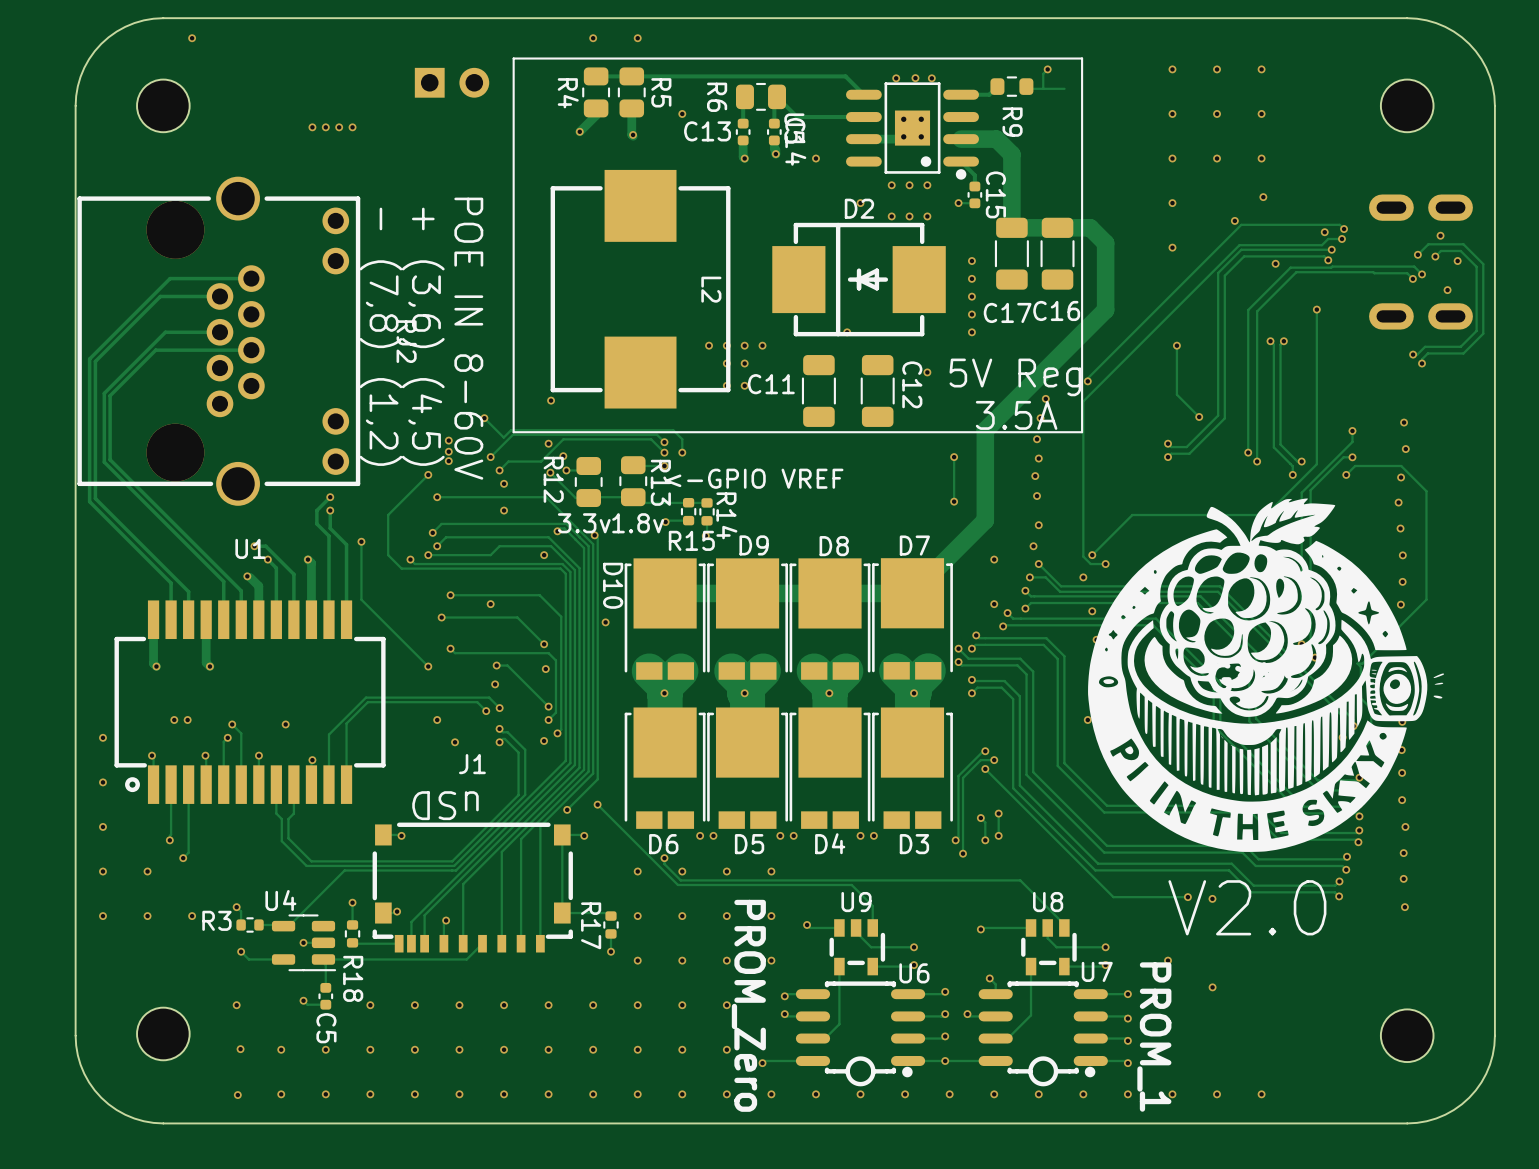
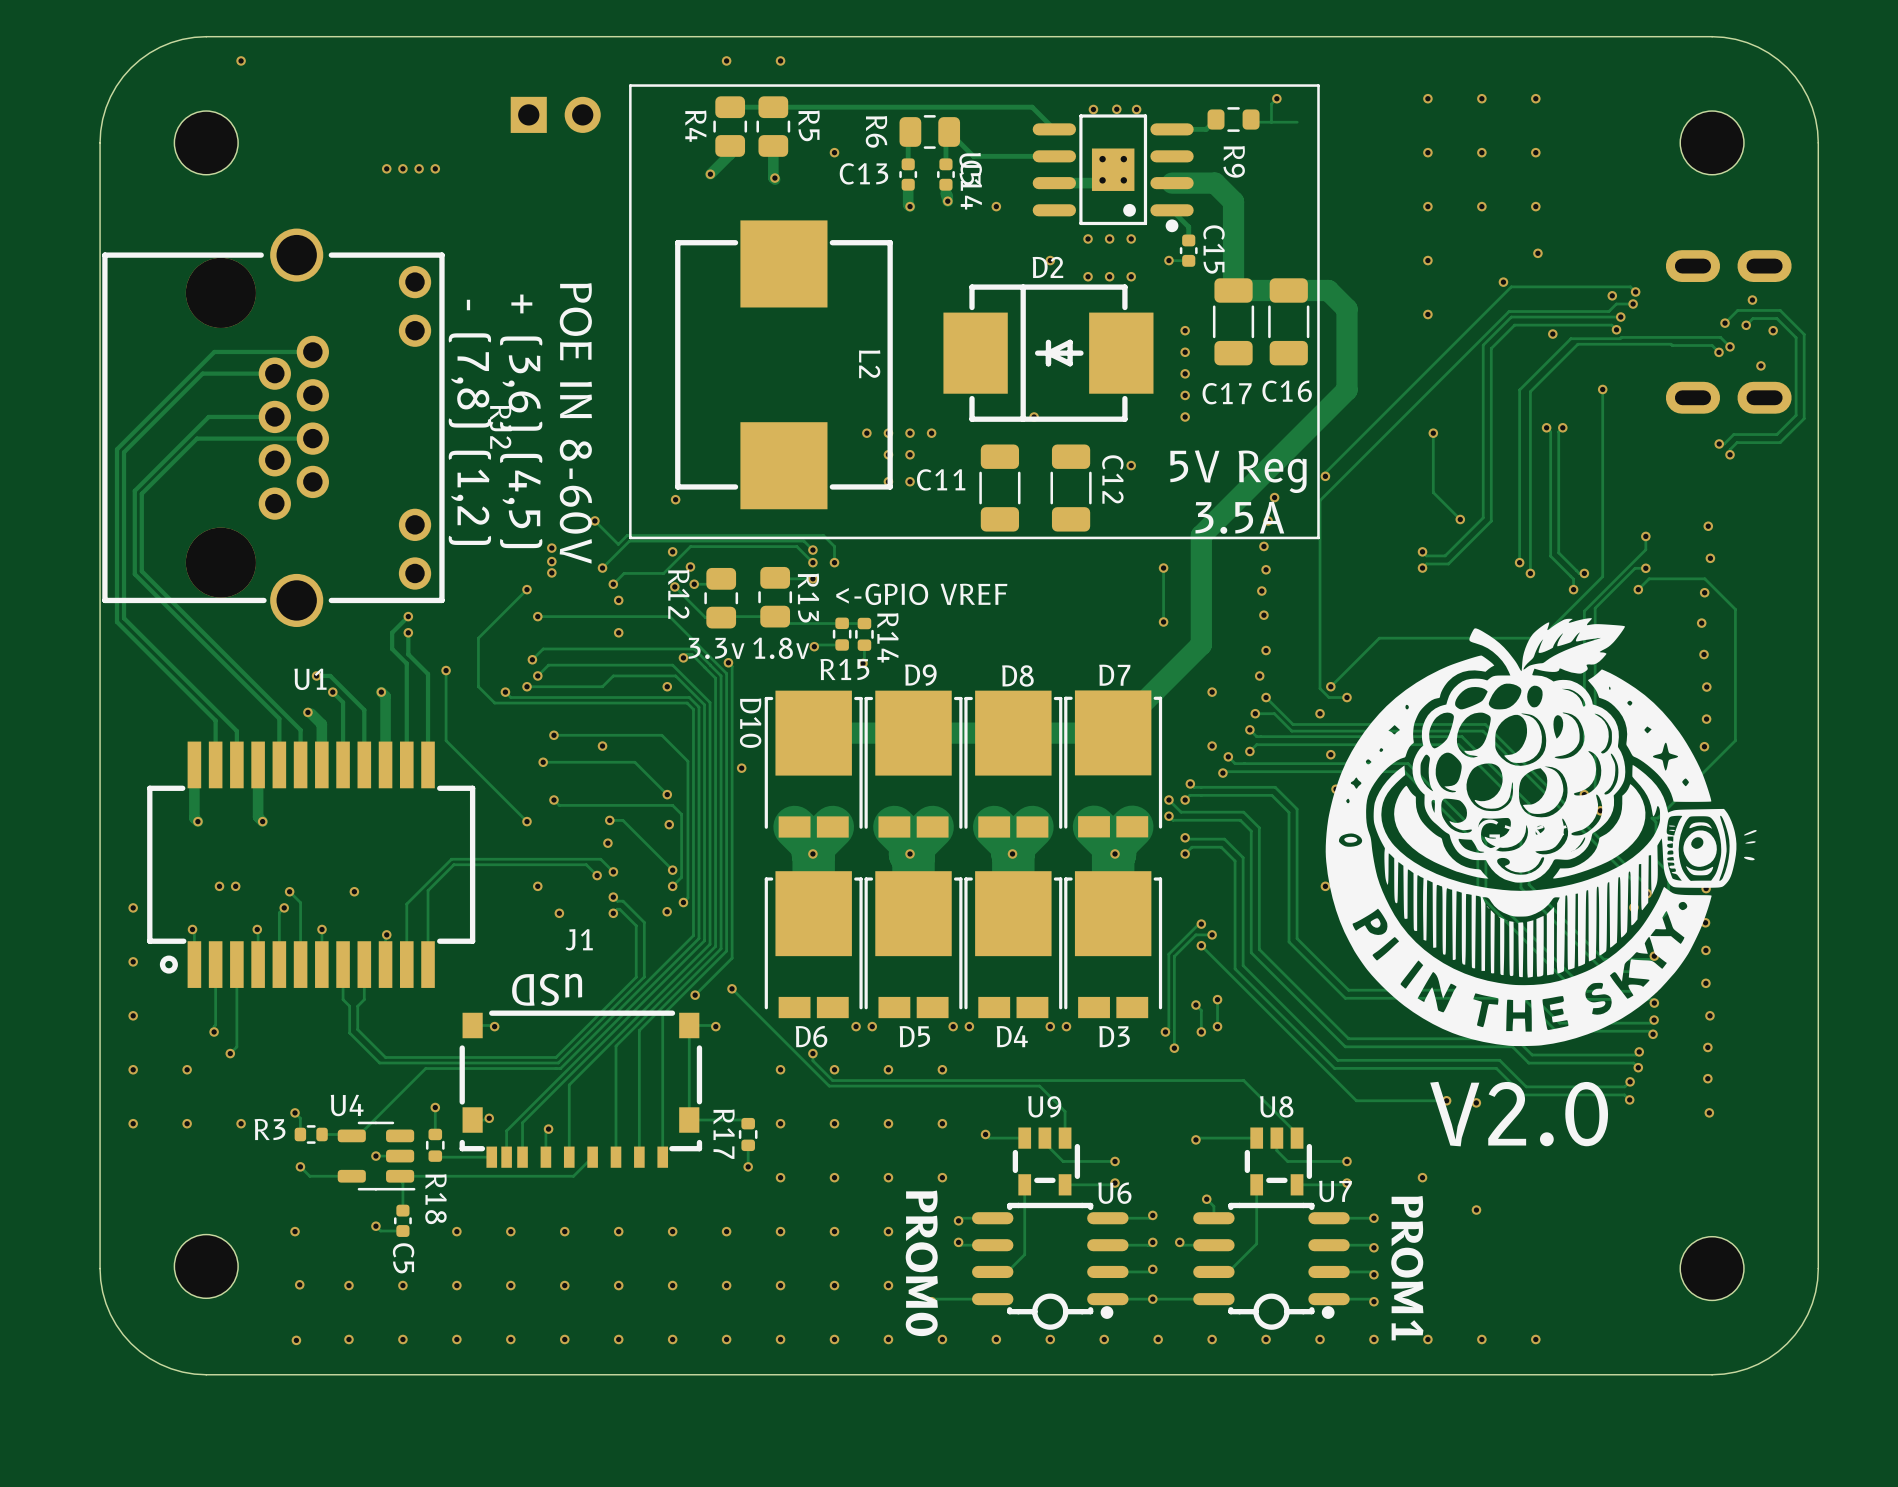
text: PROM_Zero (748, 1005) -> none
text: none -> PROM0 (921, 1263)
text: PROM_1 (1154, 1037) -> PROM1 (1407, 1268)

